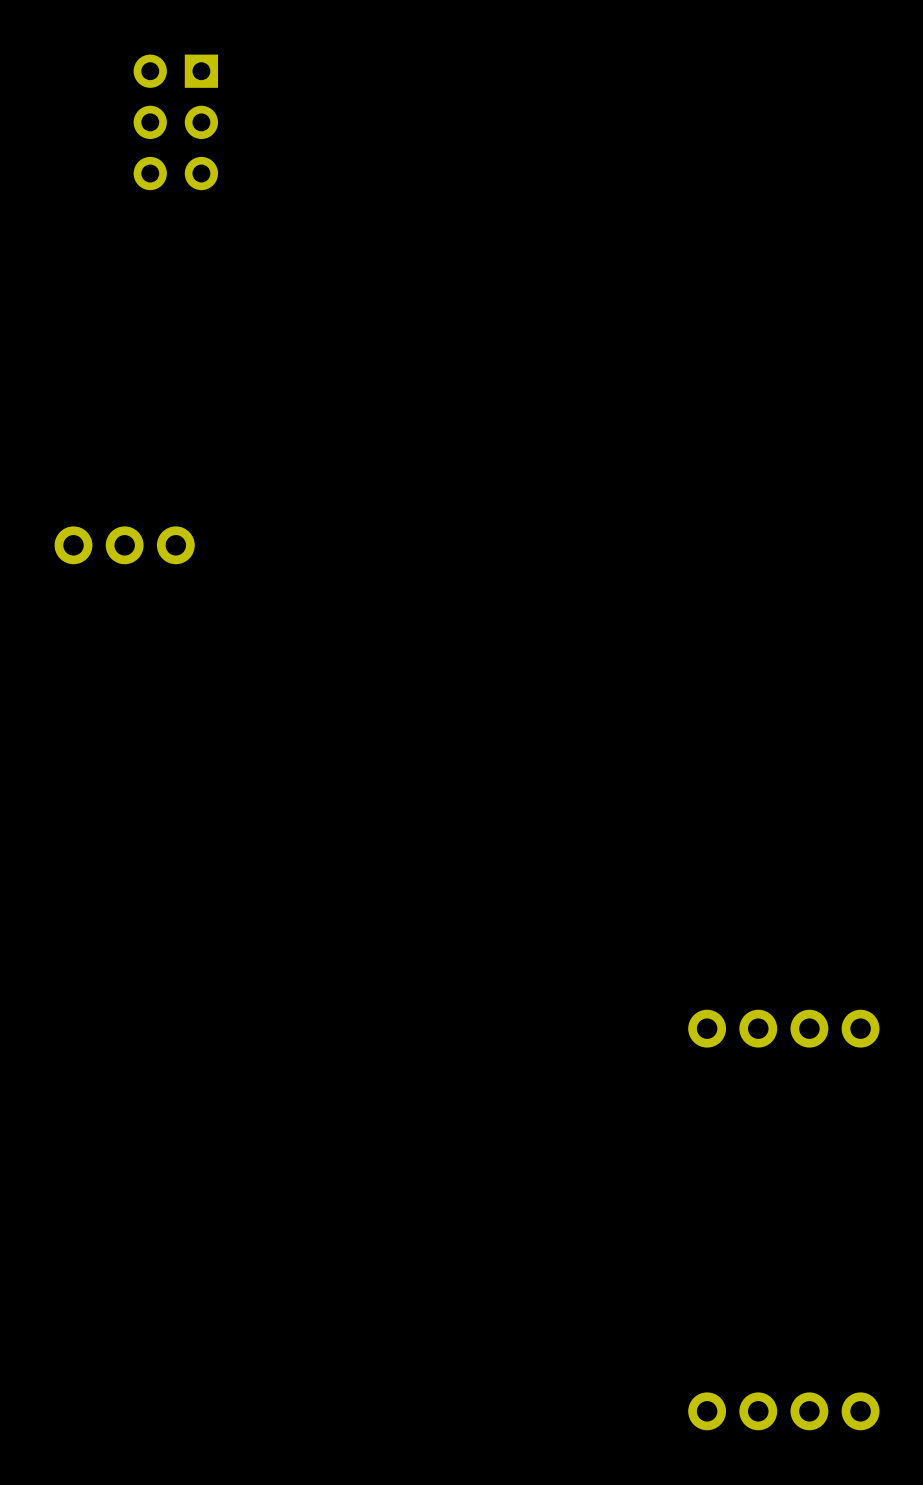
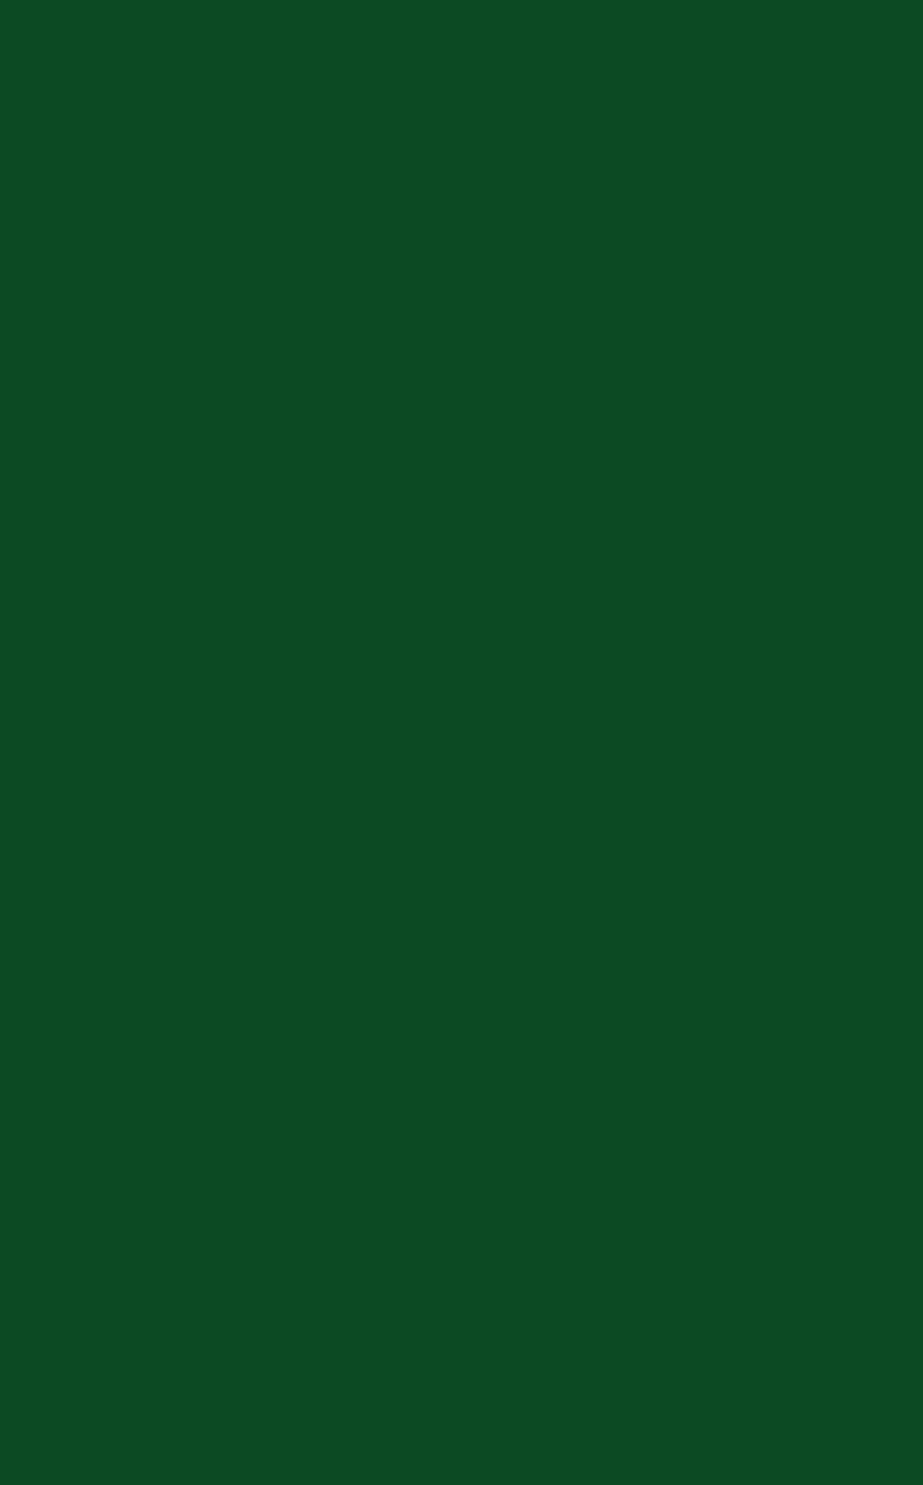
part: (175, 122) -> none
part: (124, 545) -> none
part: (783, 1028) -> none
part: (783, 1411) -> none

